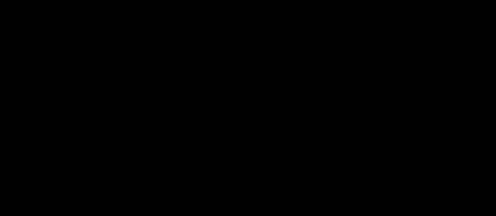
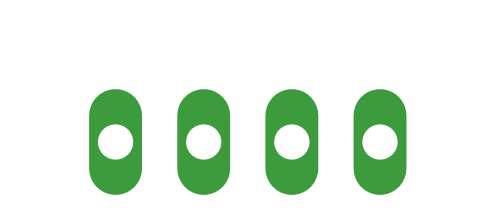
part: none -> (247, 142)

